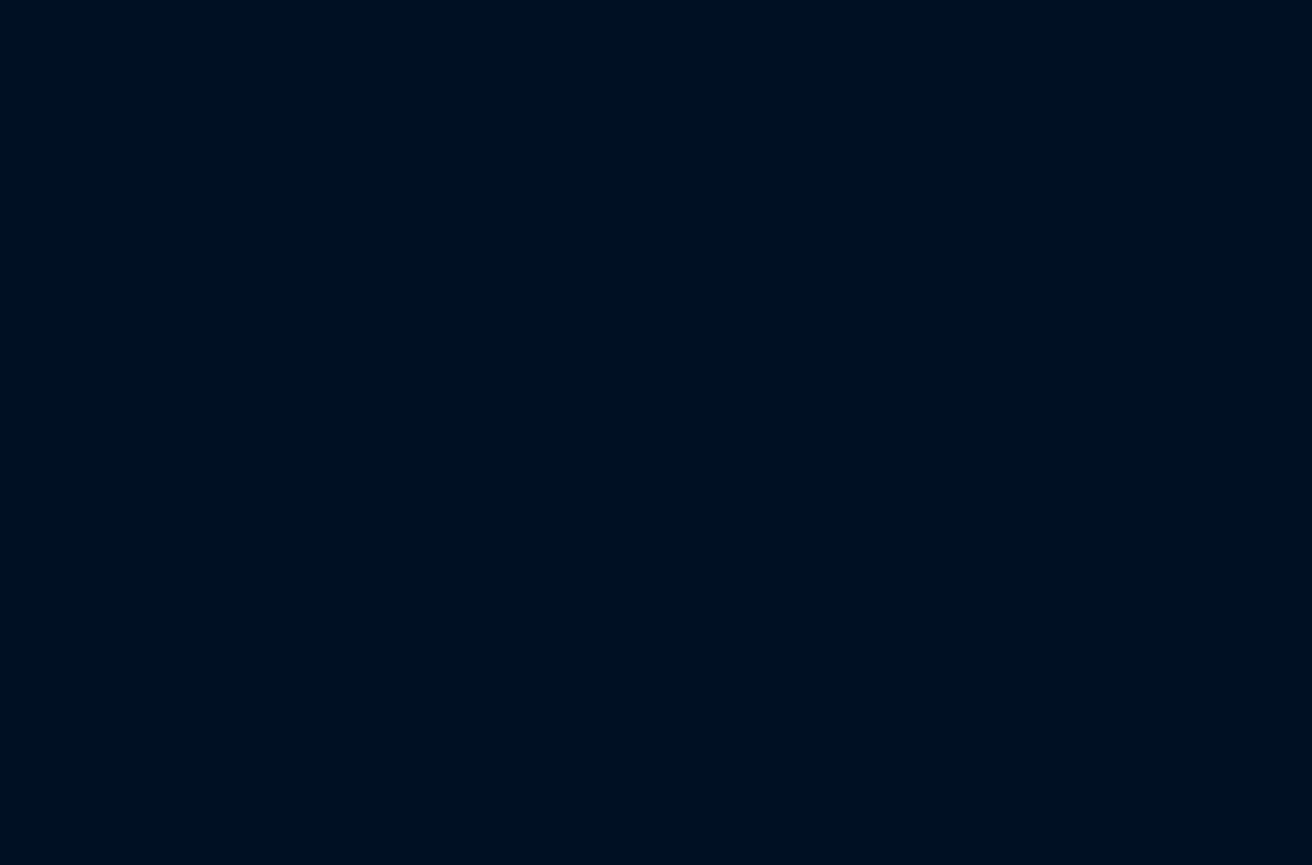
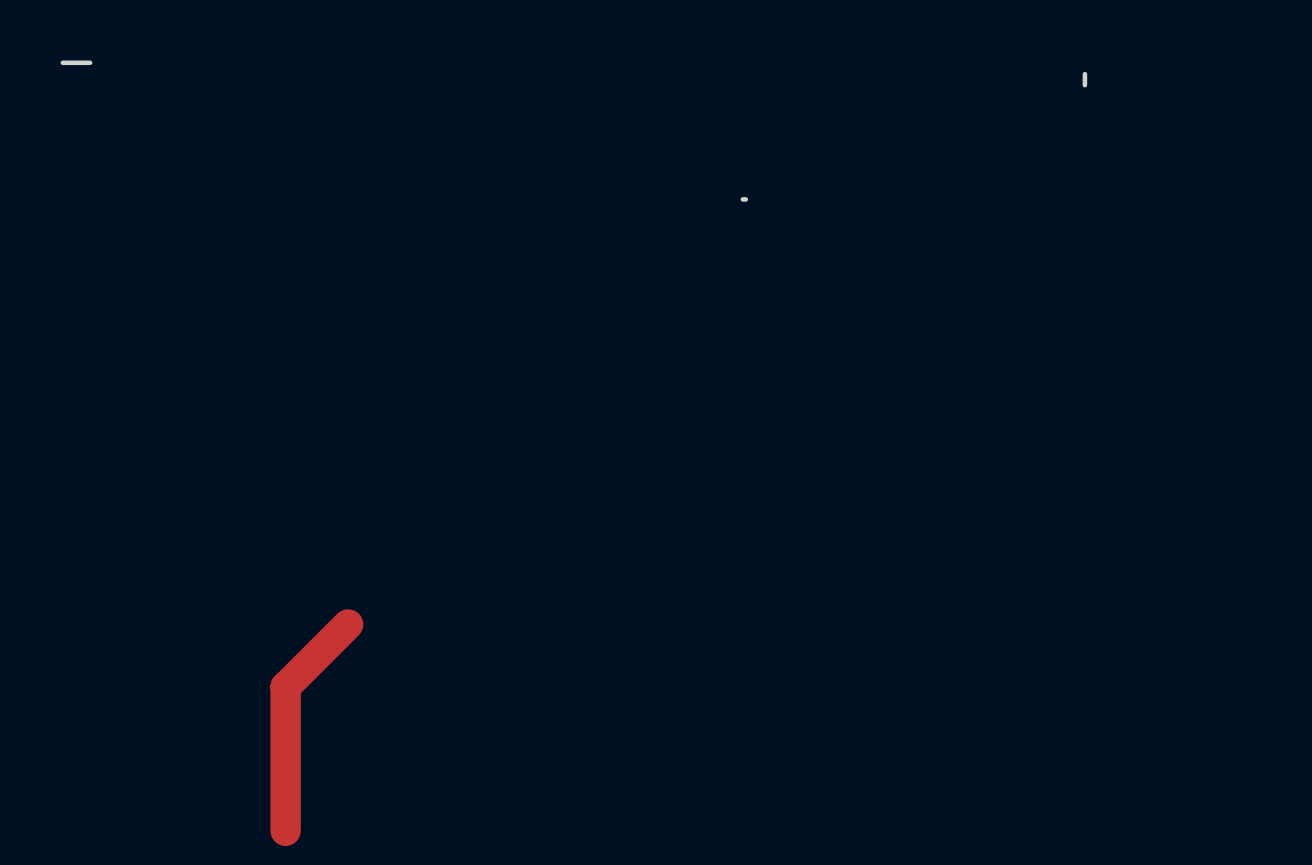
board edge: none -> (90, 62) (62, 62)
board edge: none -> (1084, 74) (1084, 85)
board edge: none -> (745, 199) (742, 199)
top track: none -> (348, 624) (285, 686) (285, 830)

